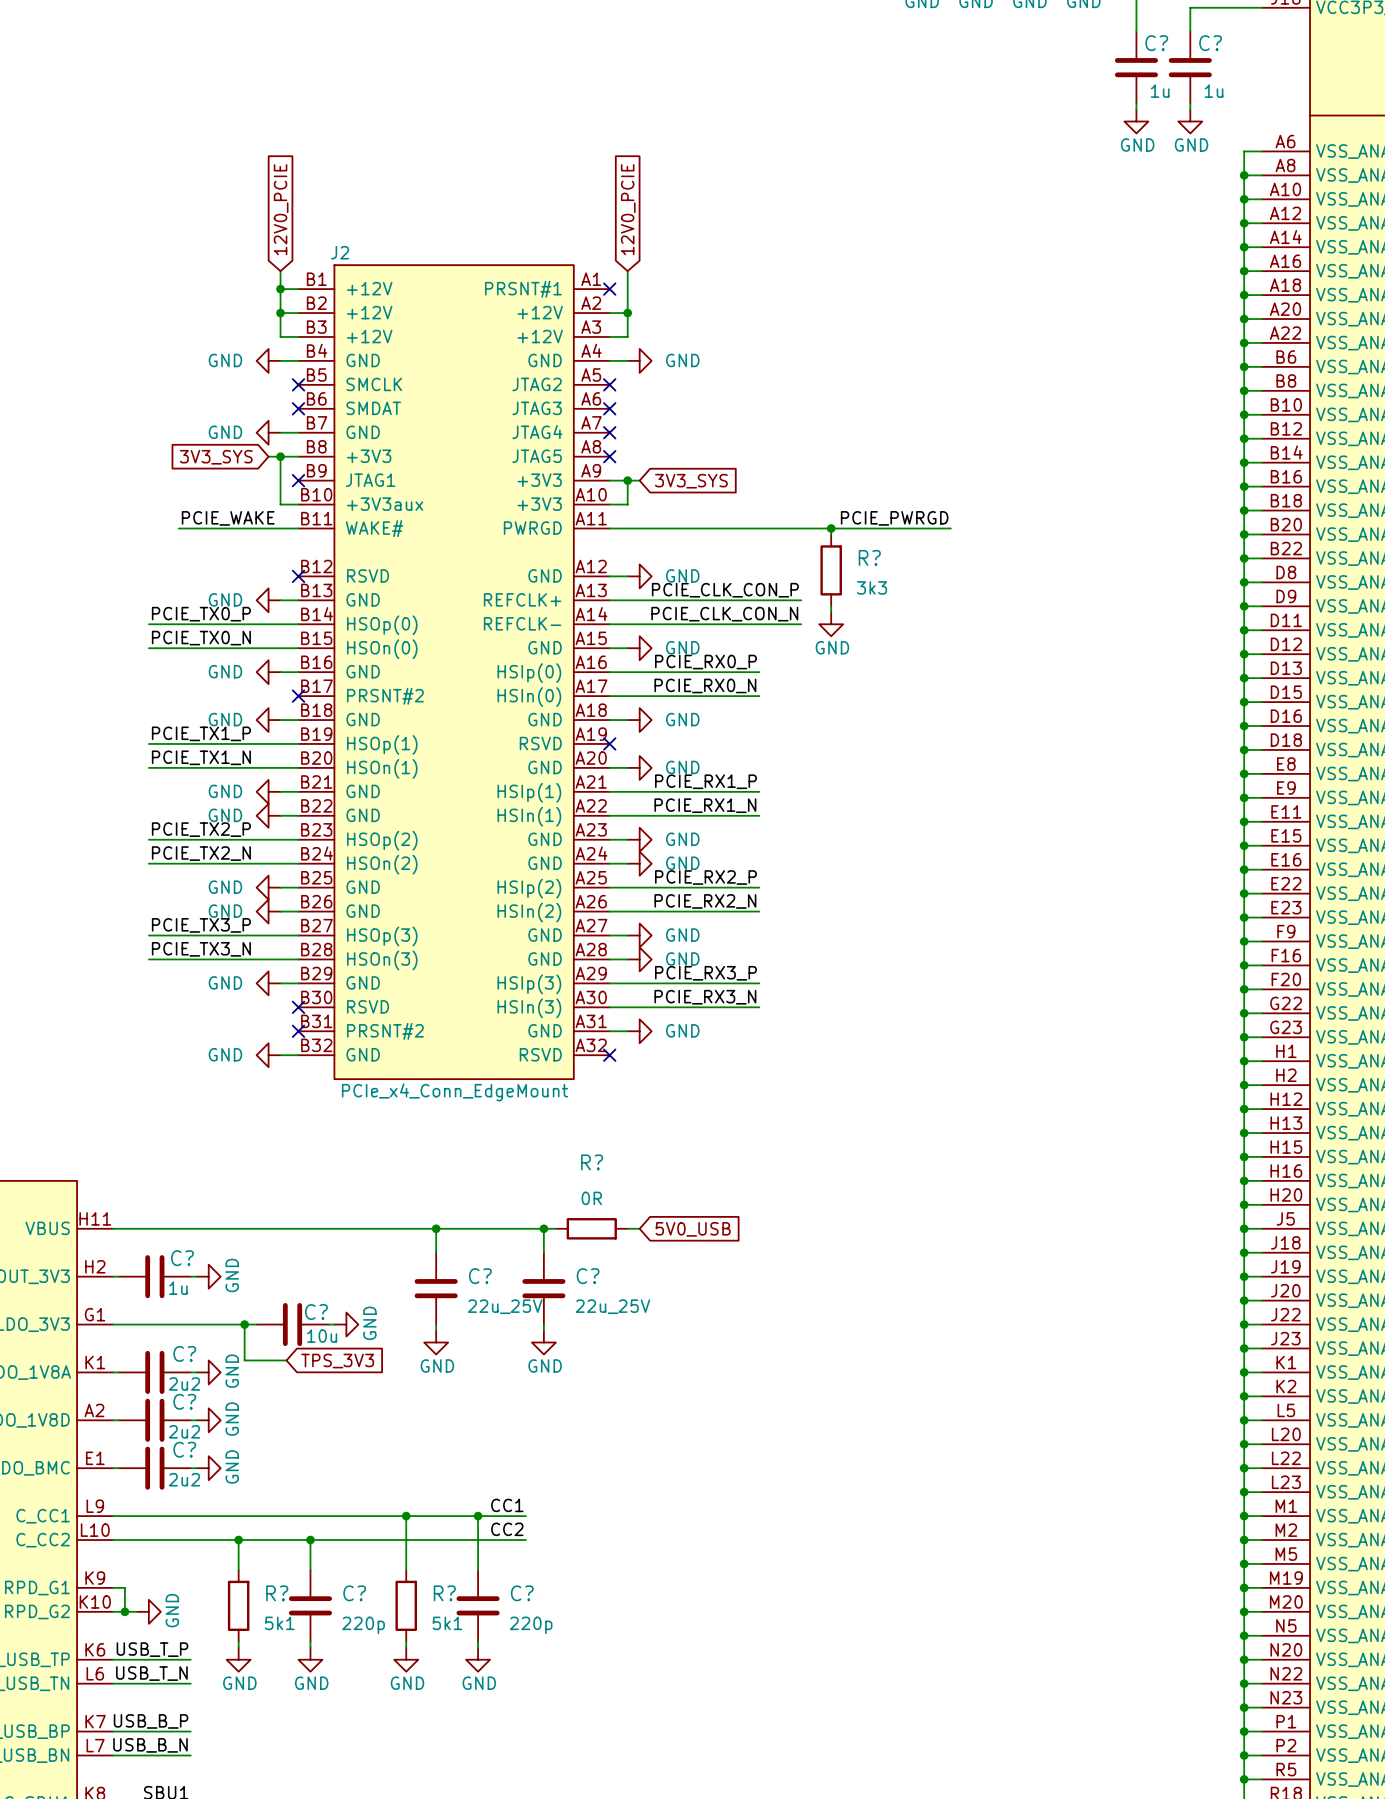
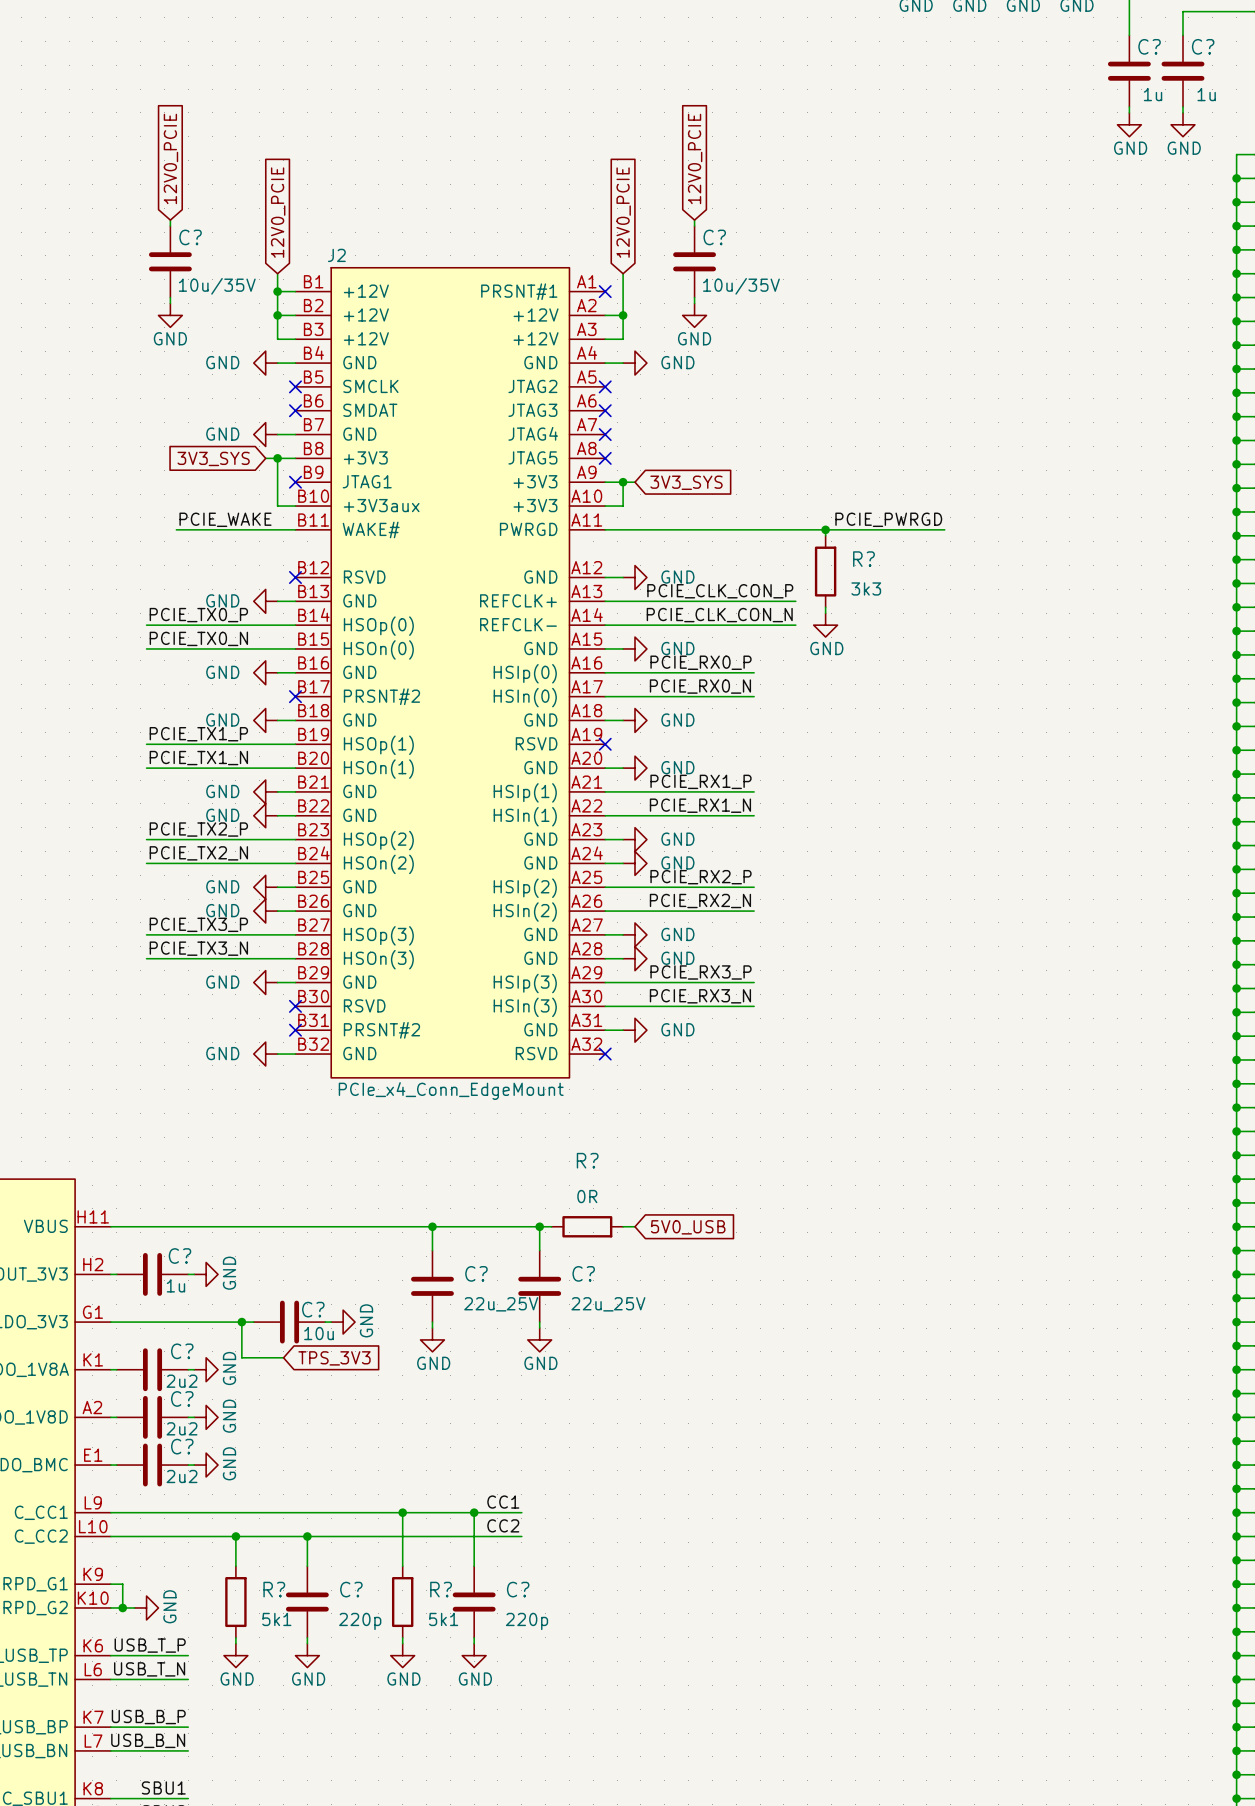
global label: none -> 12V0_PCIE (170, 158)
global label: none -> 12V0_PCIE (695, 158)
wire: none -> (170, 220) (170, 226)
wire: none -> (694, 220) (694, 226)
C?: none -> (170, 261)
C?: none -> (694, 261)
wire: none -> (170, 297) (170, 303)
wire: none -> (694, 297) (694, 303)
power symbol: none -> GND (170, 315)
power symbol: none -> GND (694, 315)

